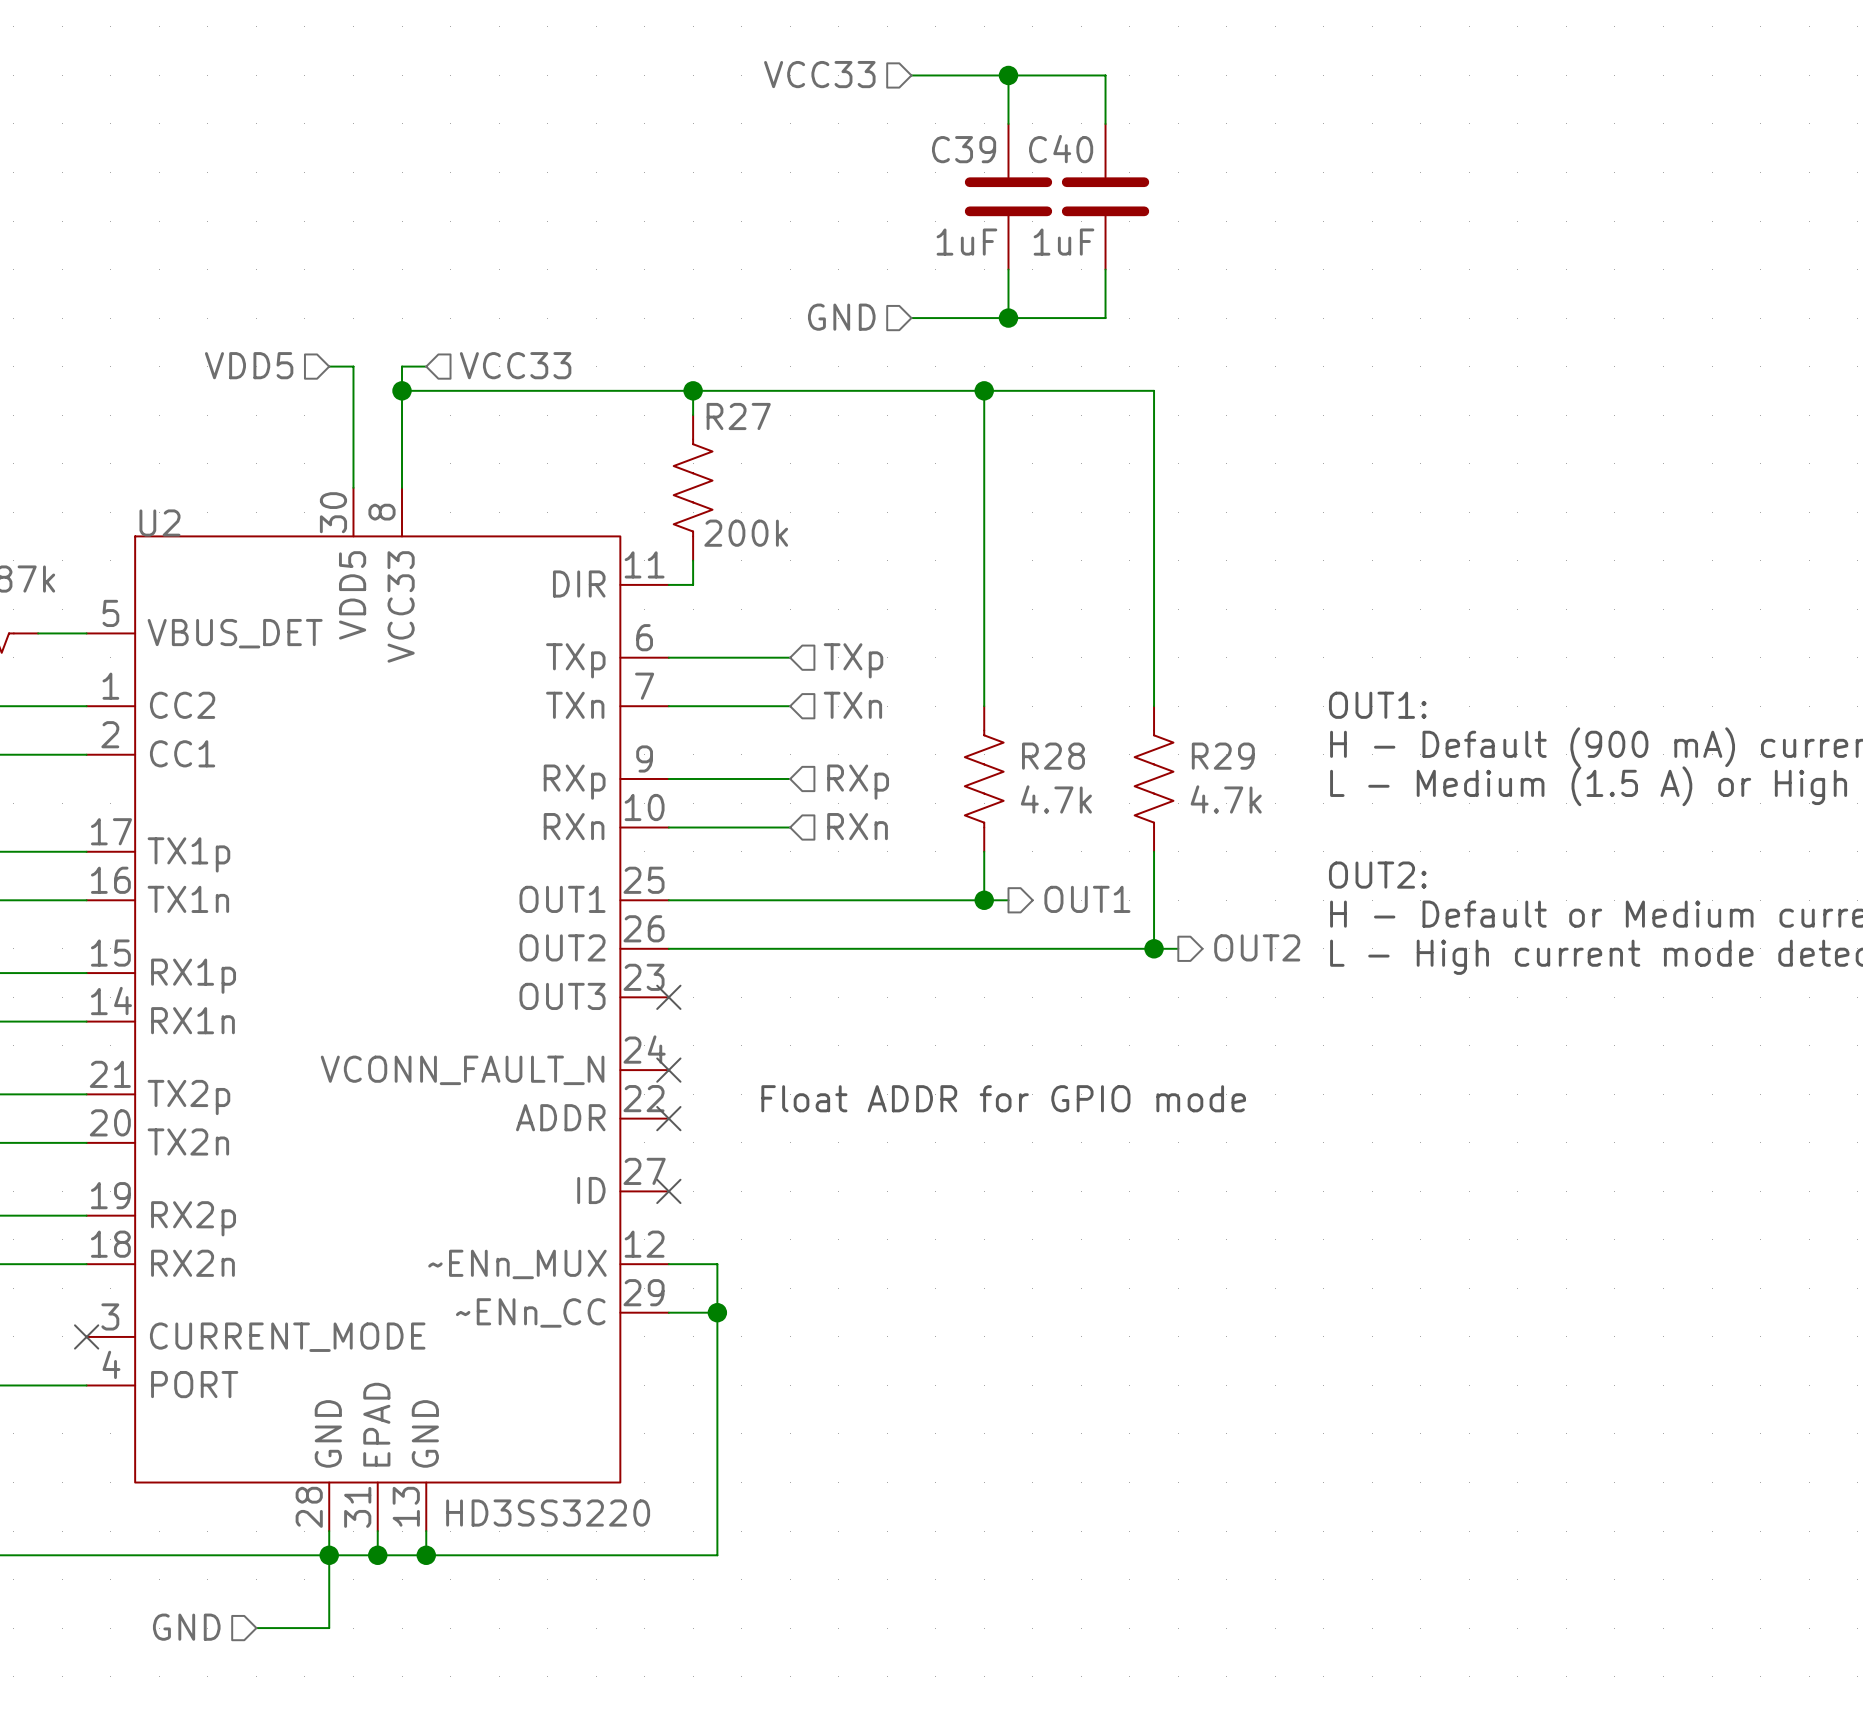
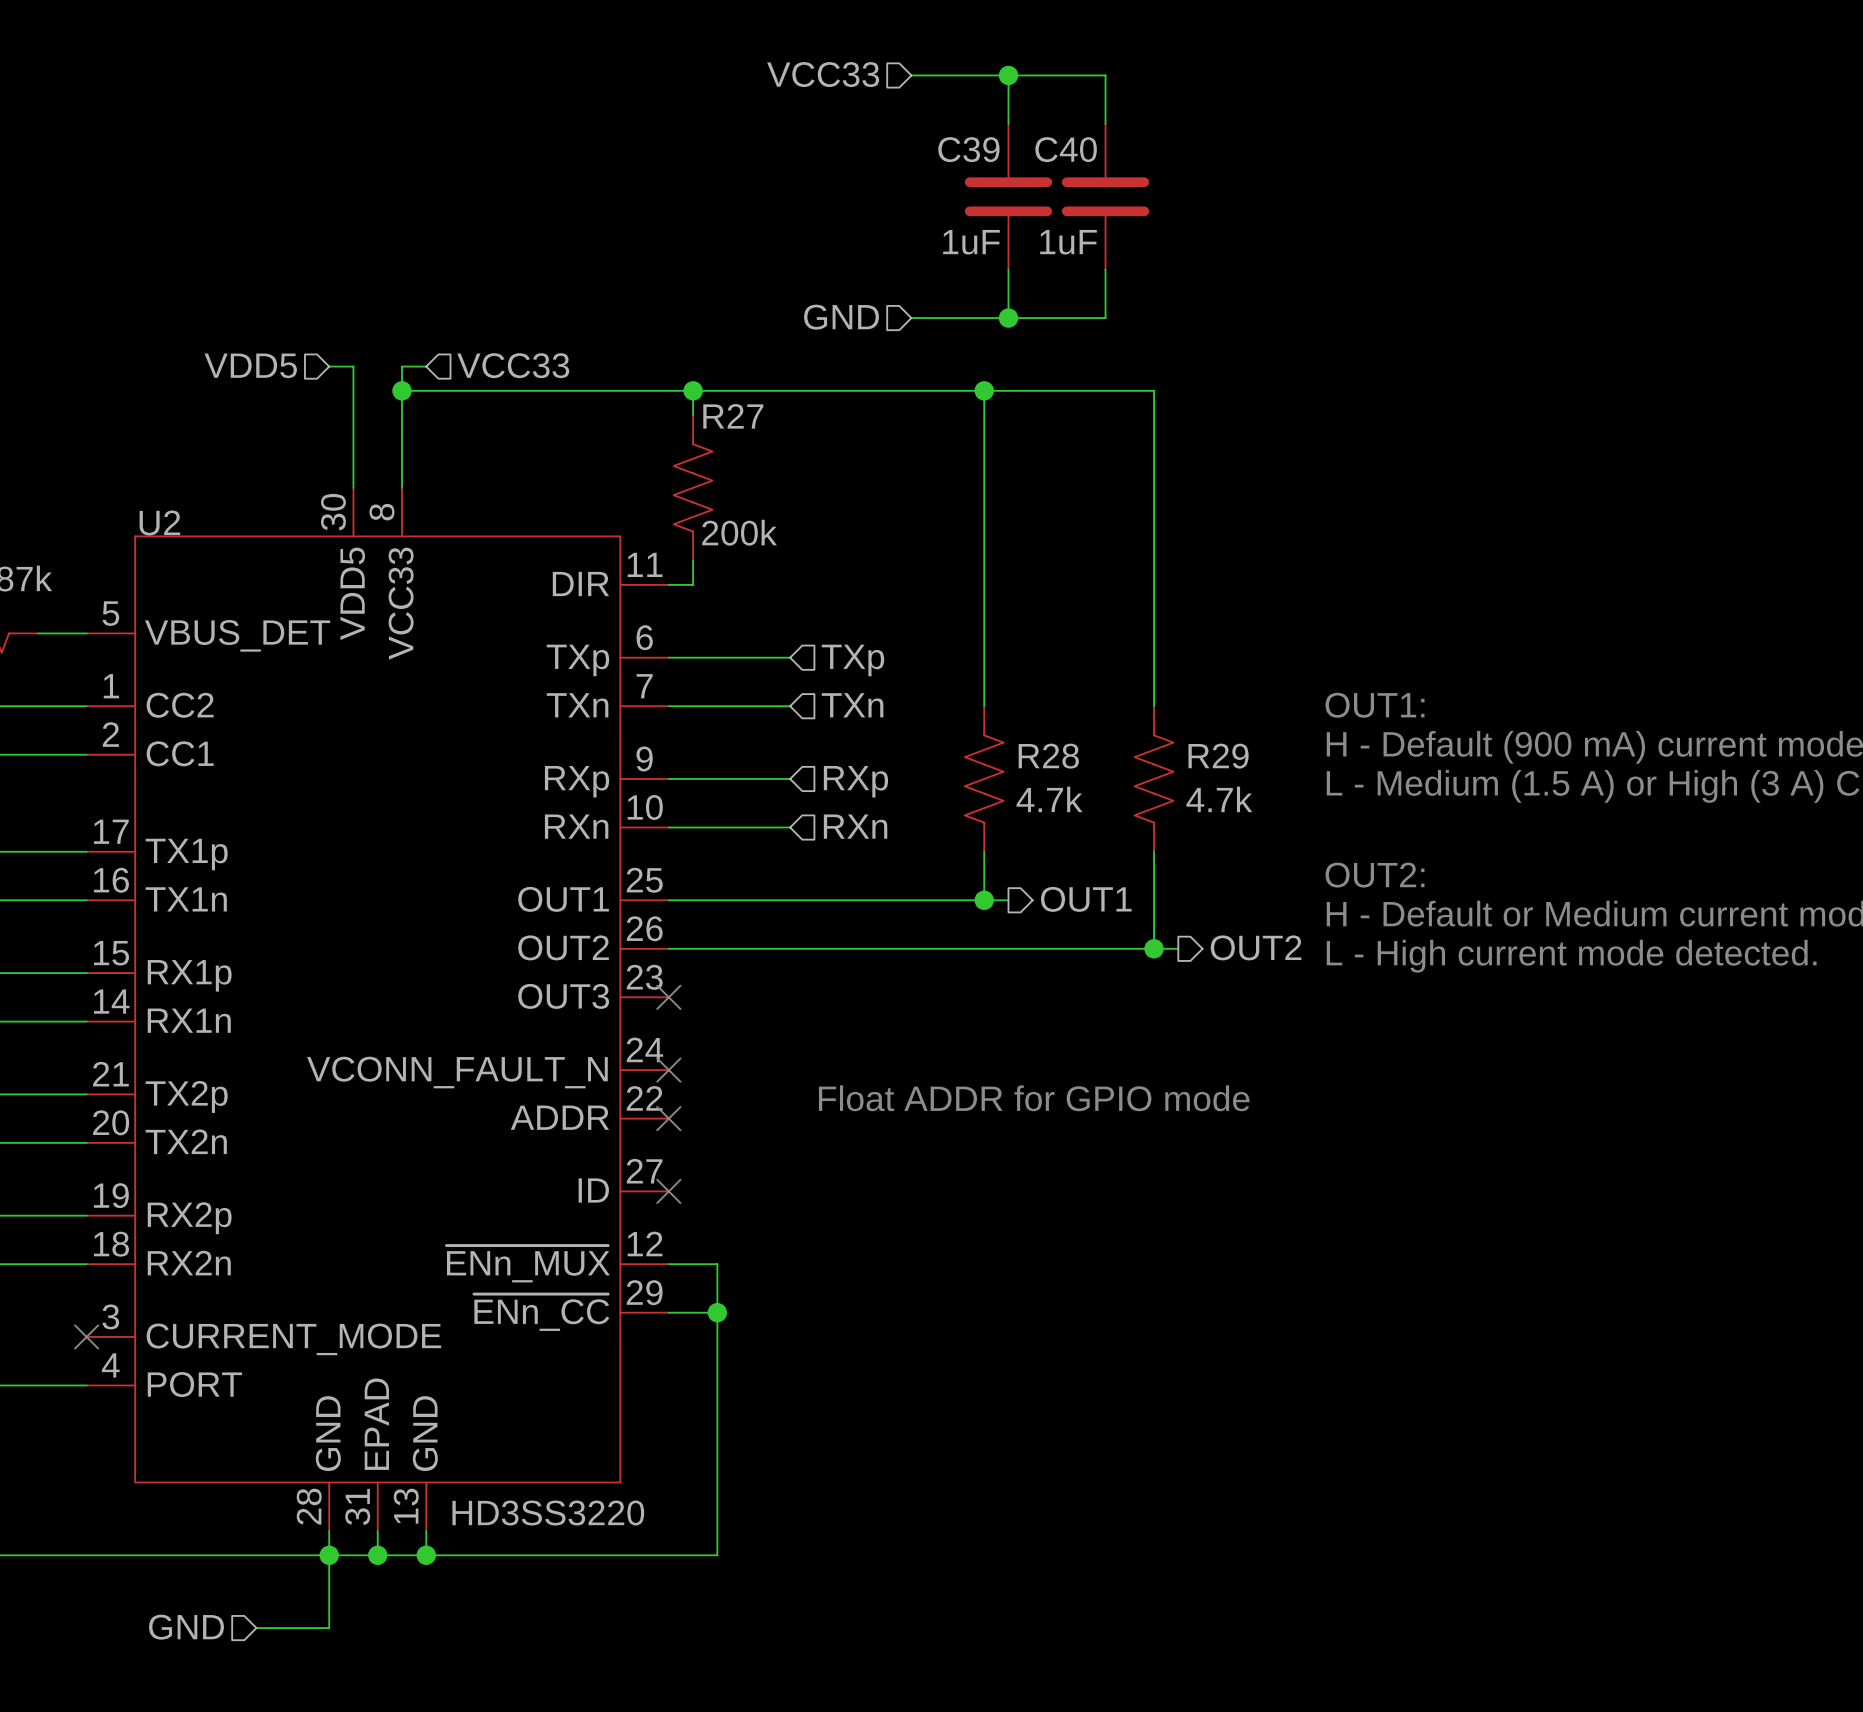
U2 pin name: ~ENn_MUX (517, 1264) -> ~{ENn_MUX} (528, 1263)
U2 pin name: ~ENn_CC (530, 1312) -> ~{ENn_CC} (541, 1312)

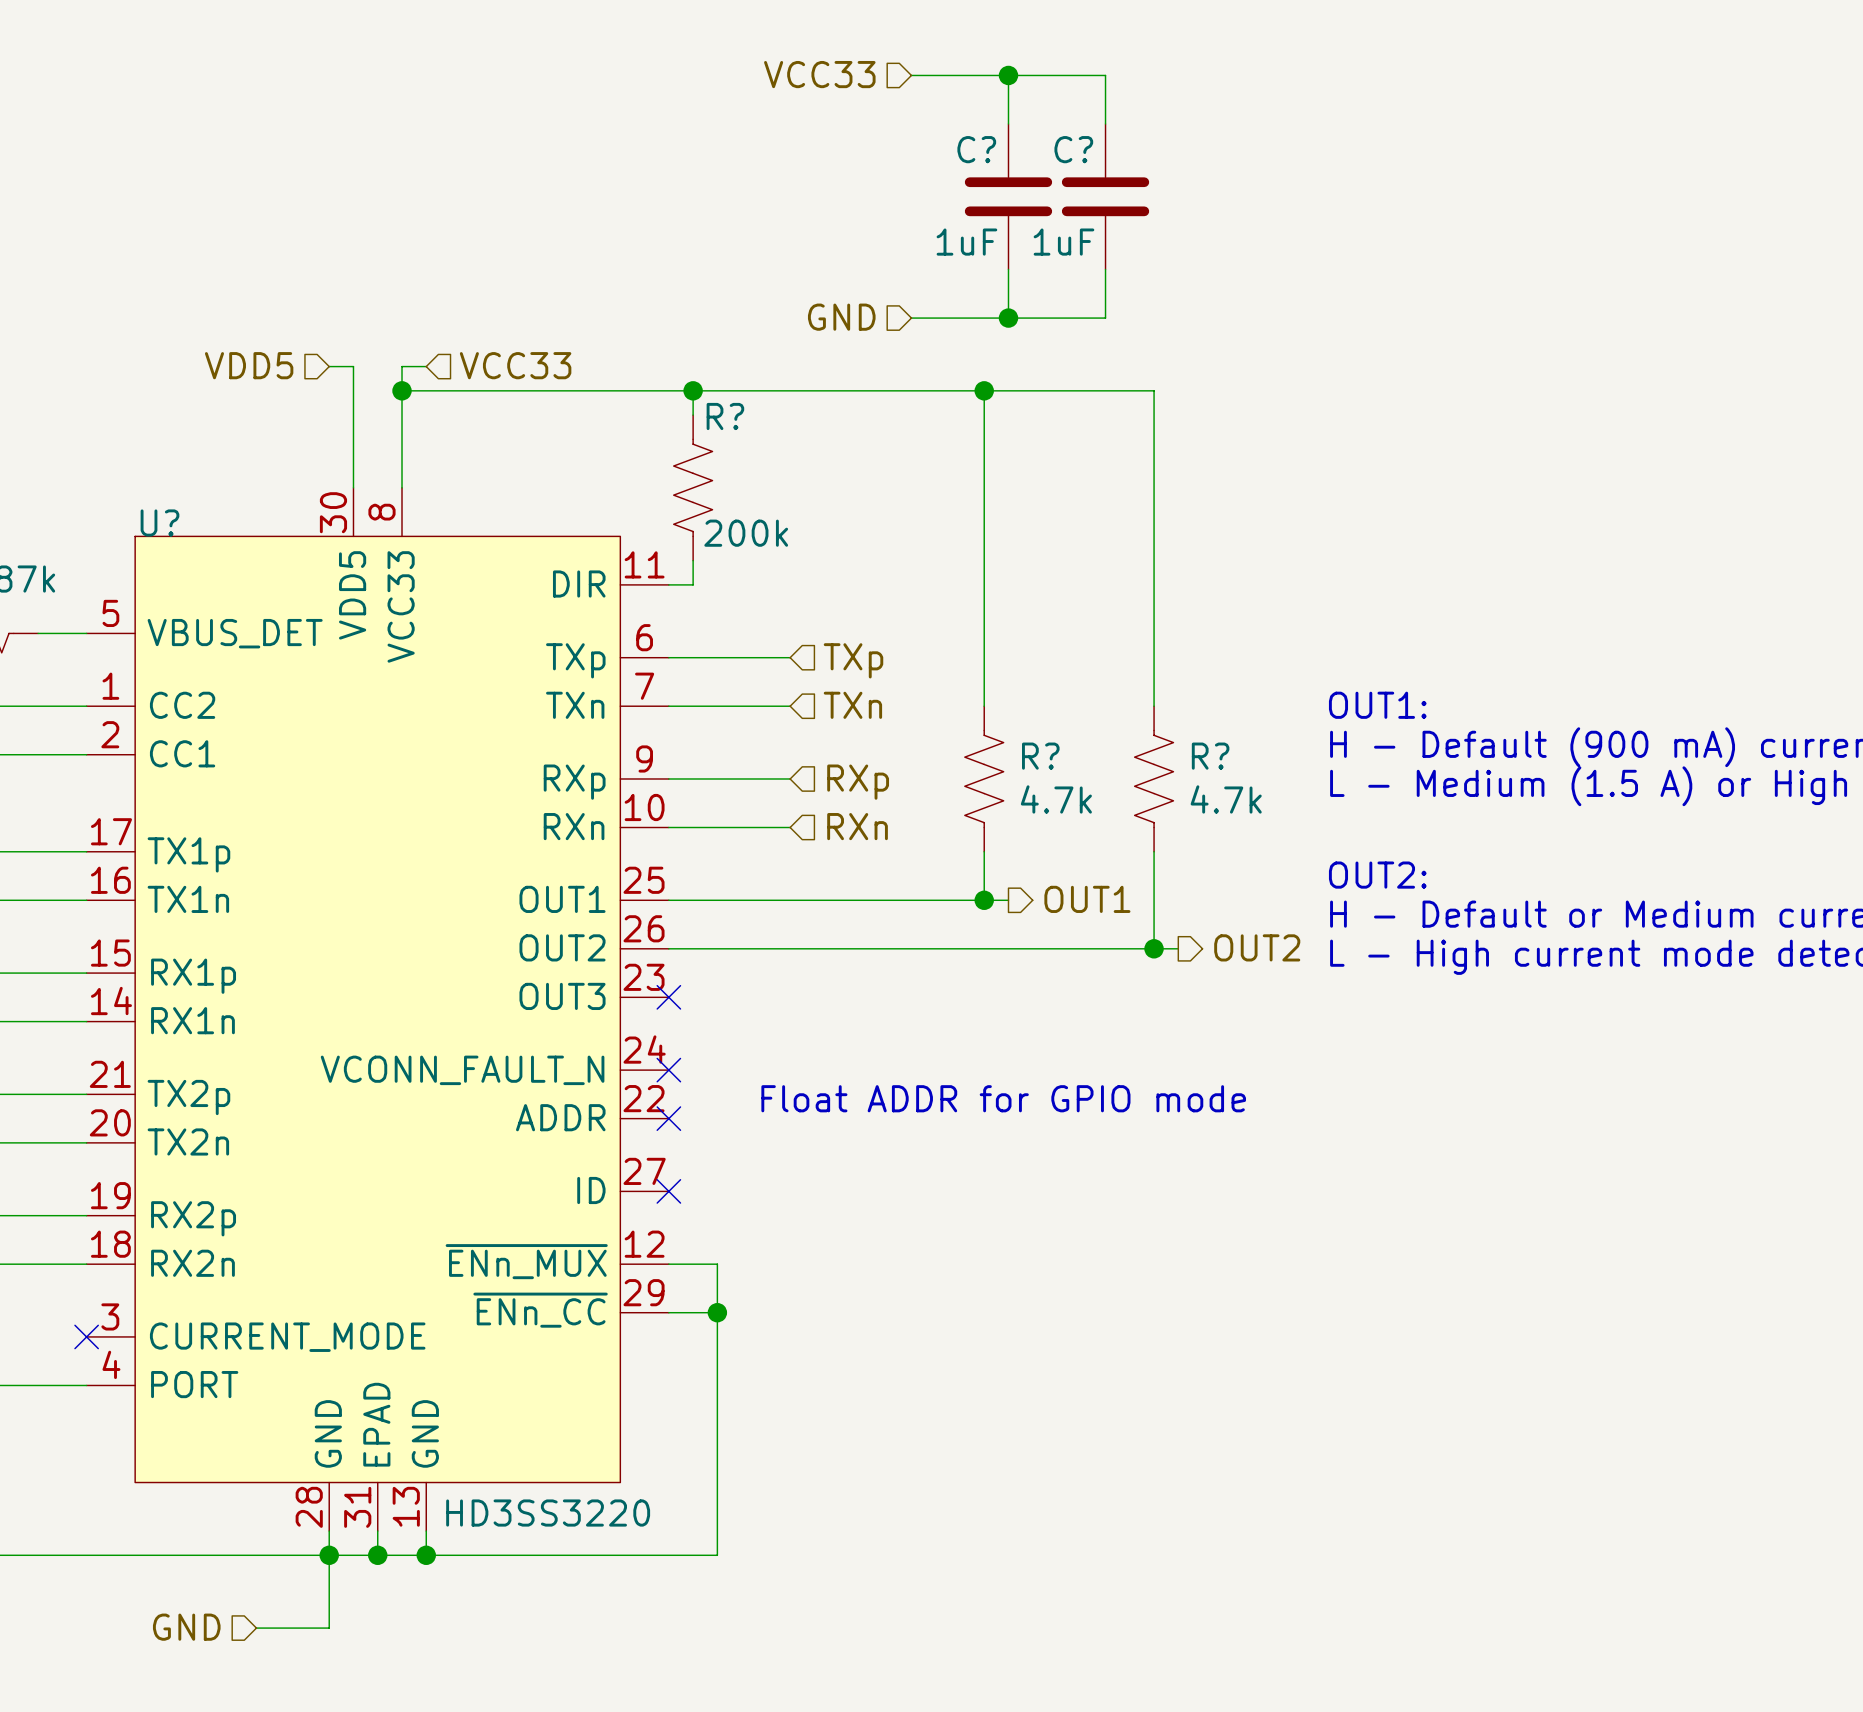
C39 name: C39 (968, 149) -> C? (976, 149)
C40 name: C40 (1066, 149) -> C? (1073, 149)
R27 name: R27 (733, 416) -> R? (725, 416)
U2 name: U2 (159, 522) -> U? (159, 522)
R28 name: R28 (1048, 756) -> R? (1040, 756)
R29 name: R29 (1218, 756) -> R? (1210, 756)

